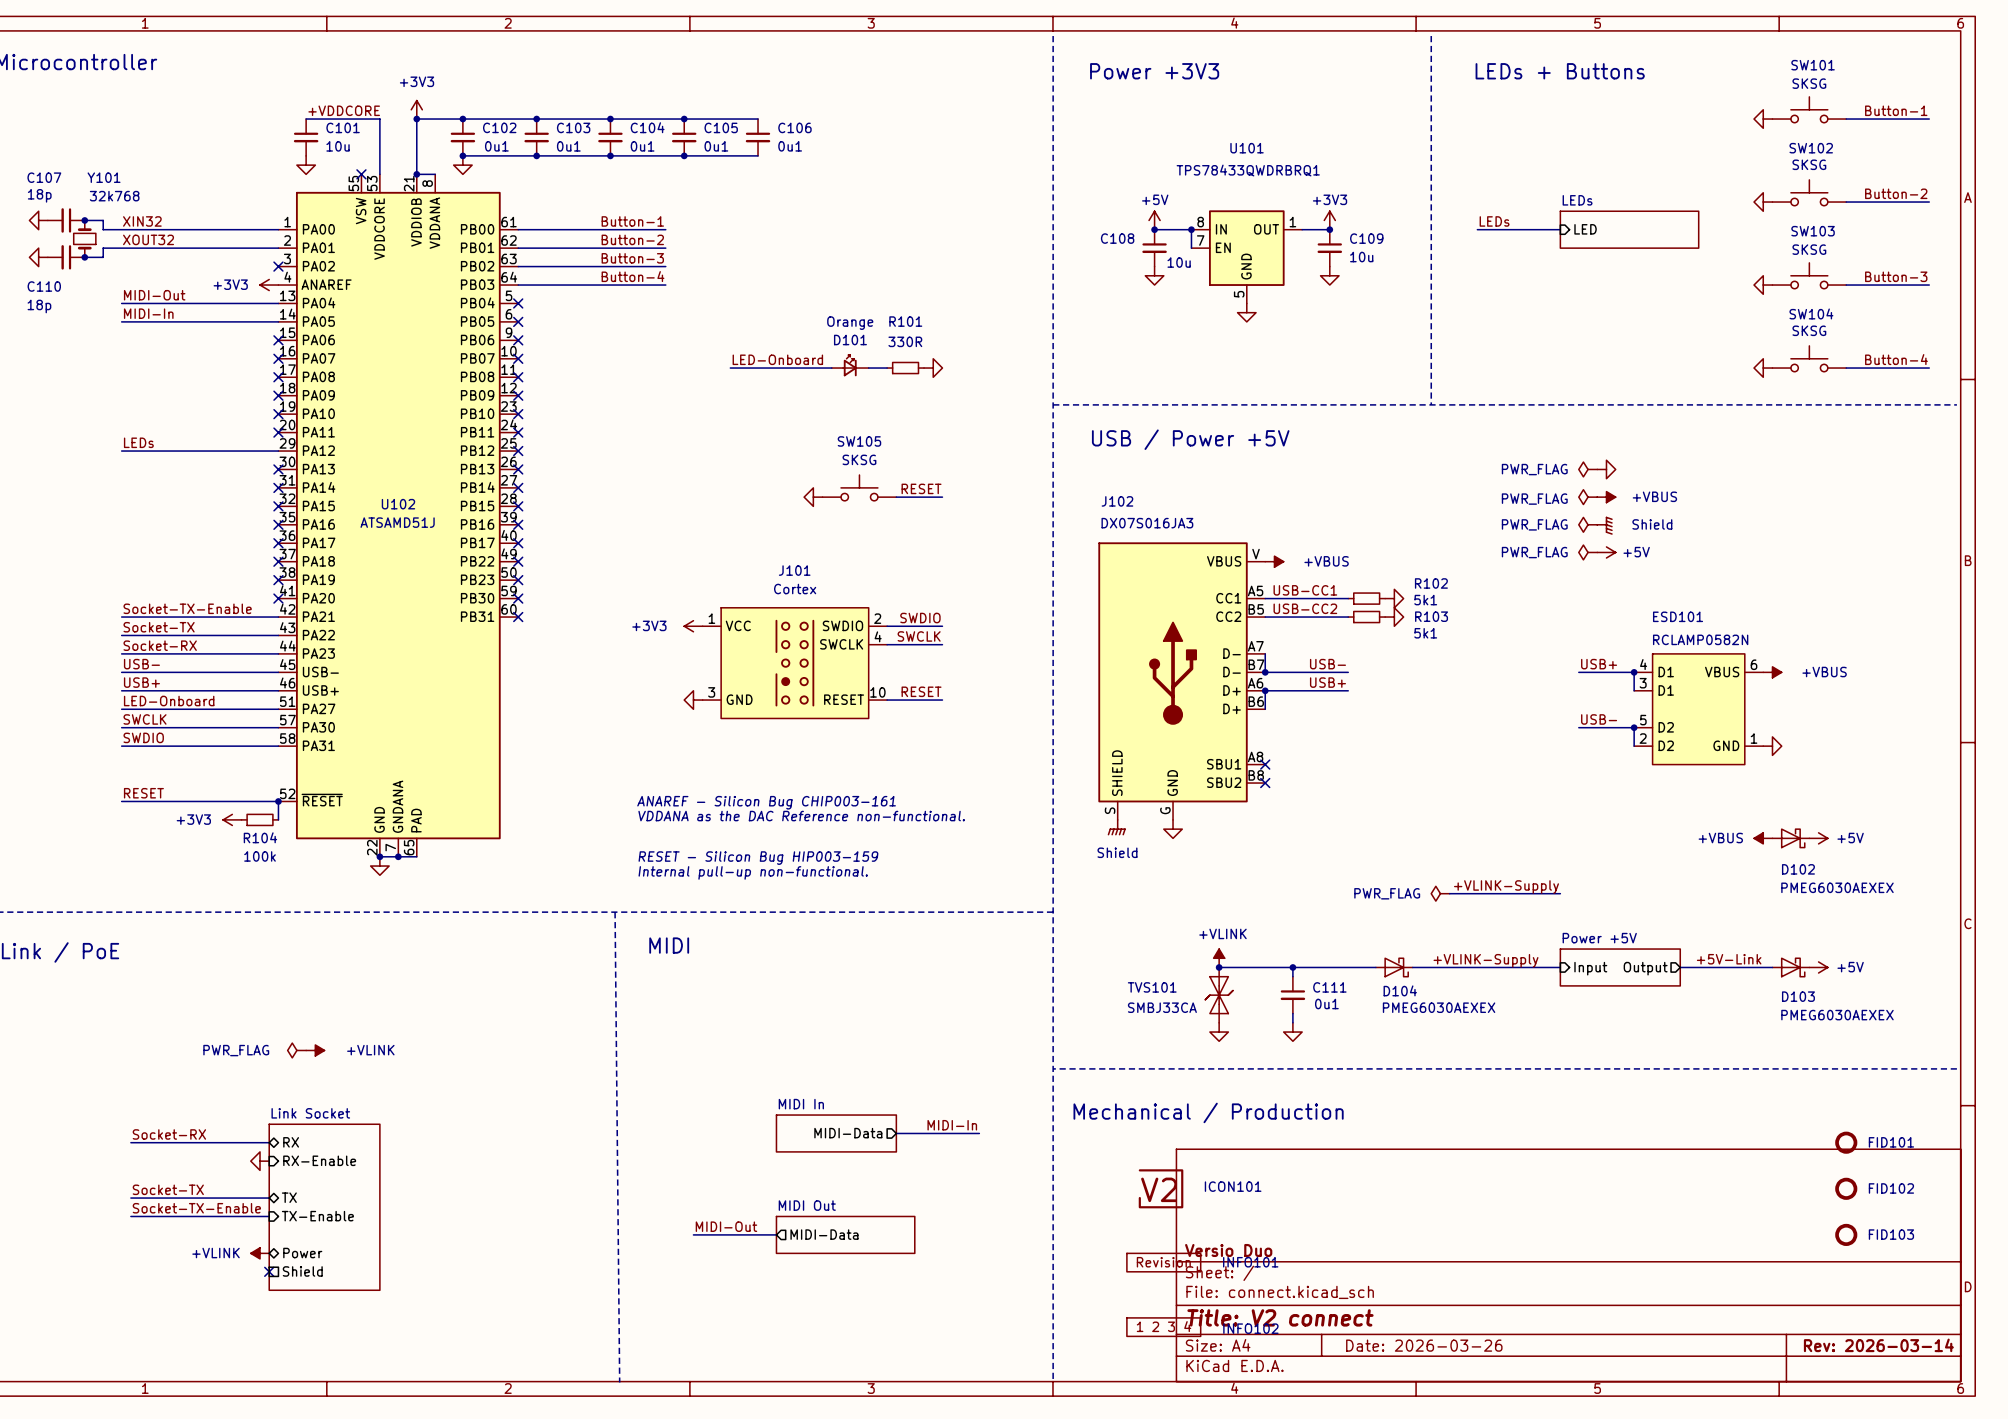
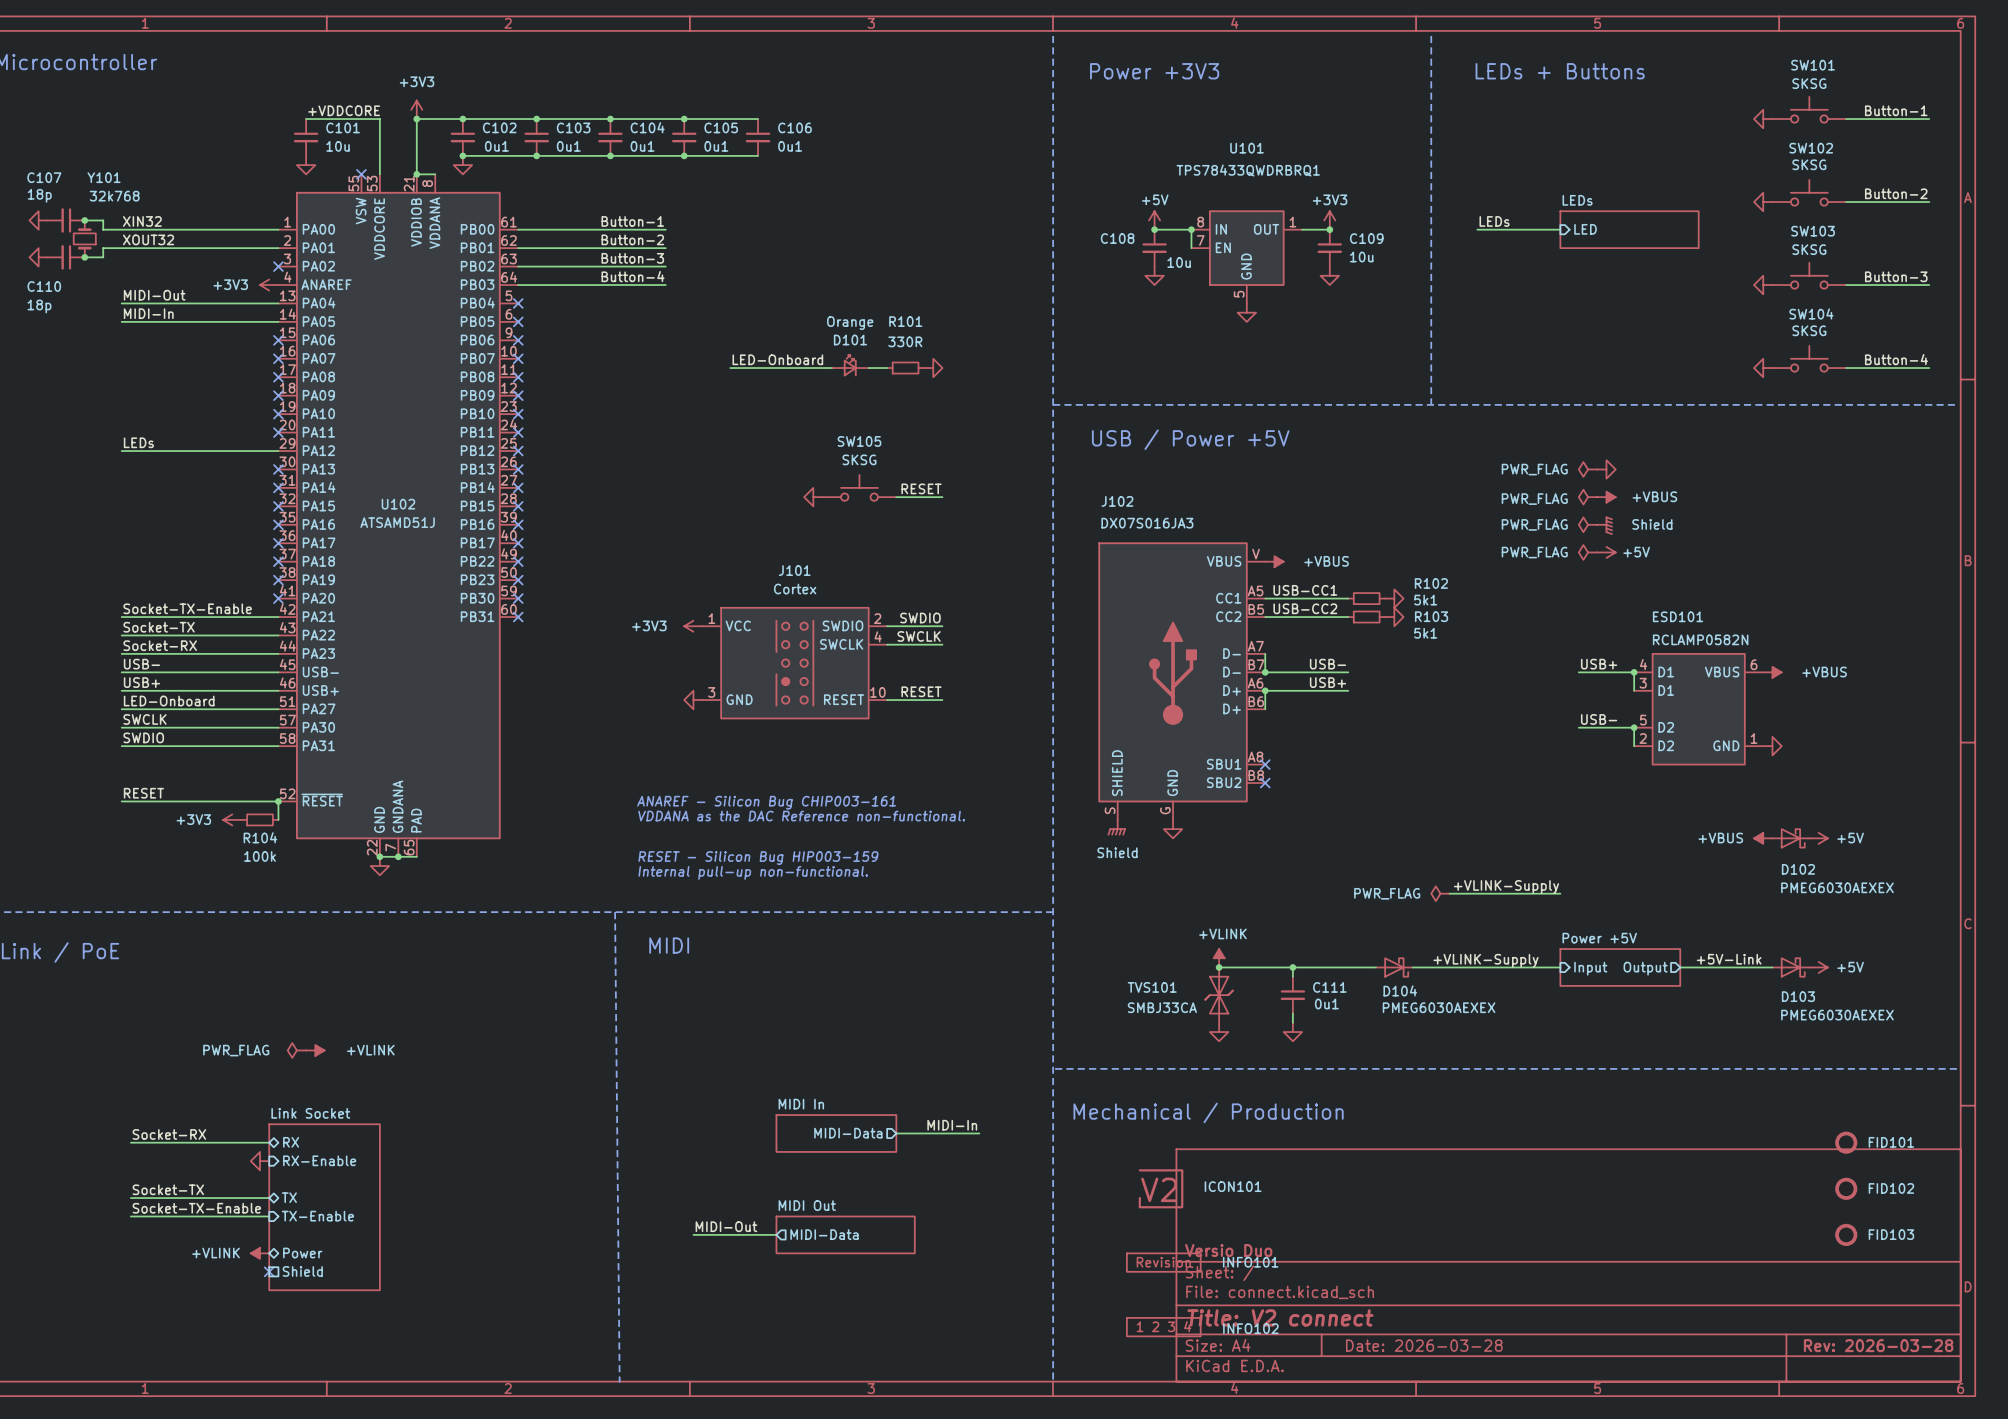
title block: Date: 2026-03-26 (1424, 1345) -> Date: 2026-03-28 (1424, 1345)
title block: Rev: 2026-03-14 (1878, 1345) -> Rev: 2026-03-28 (1878, 1345)

